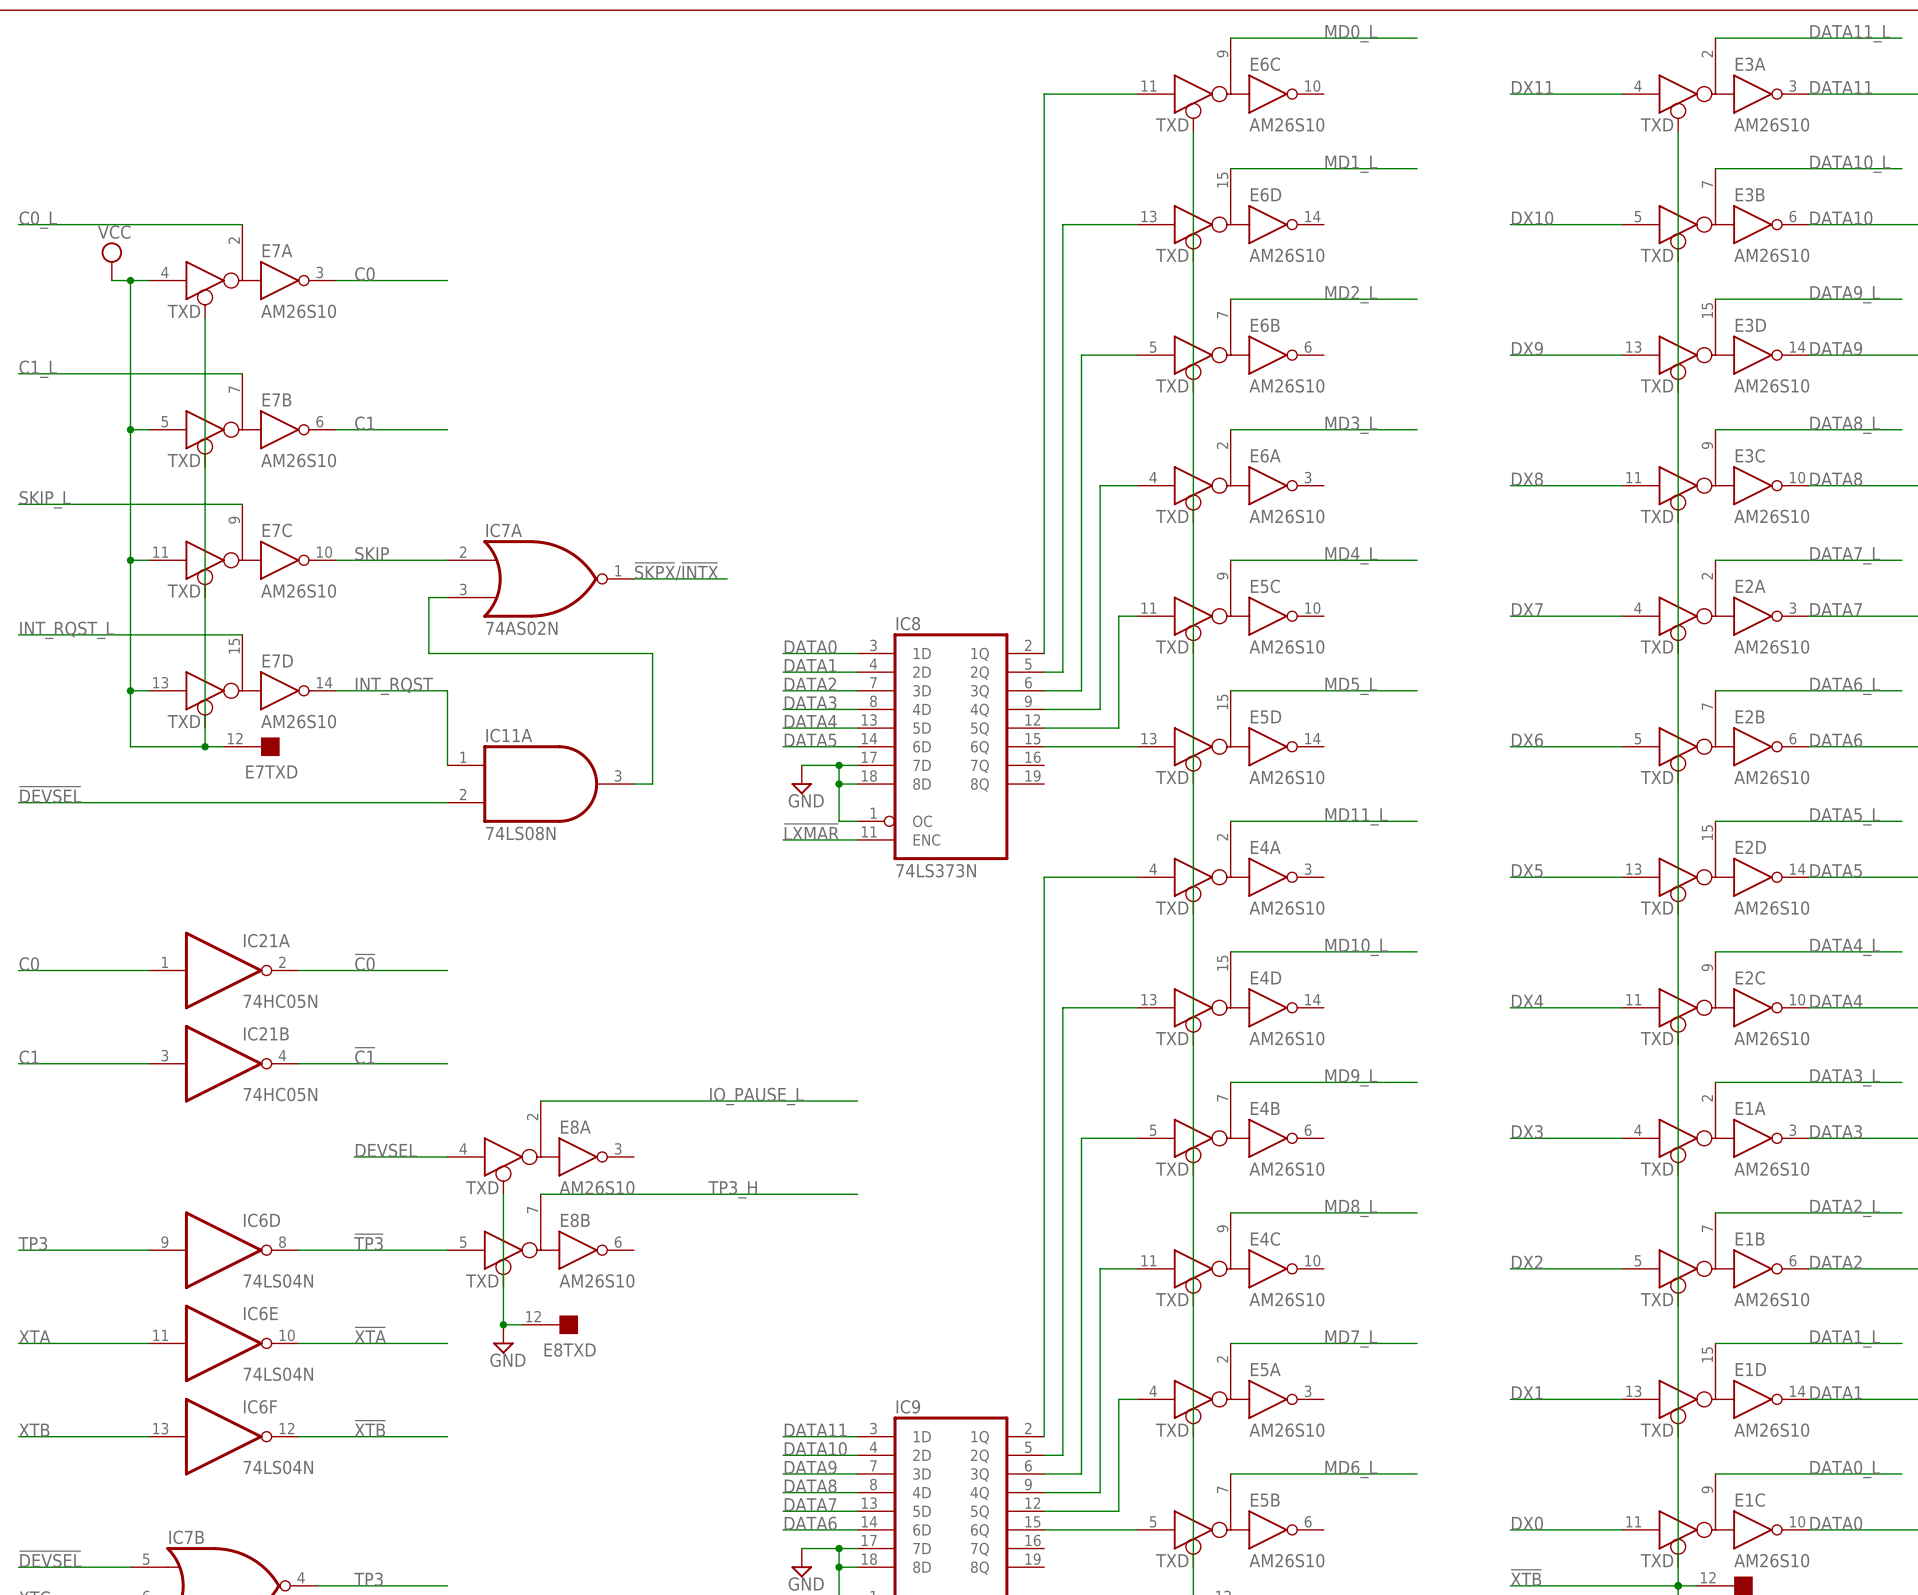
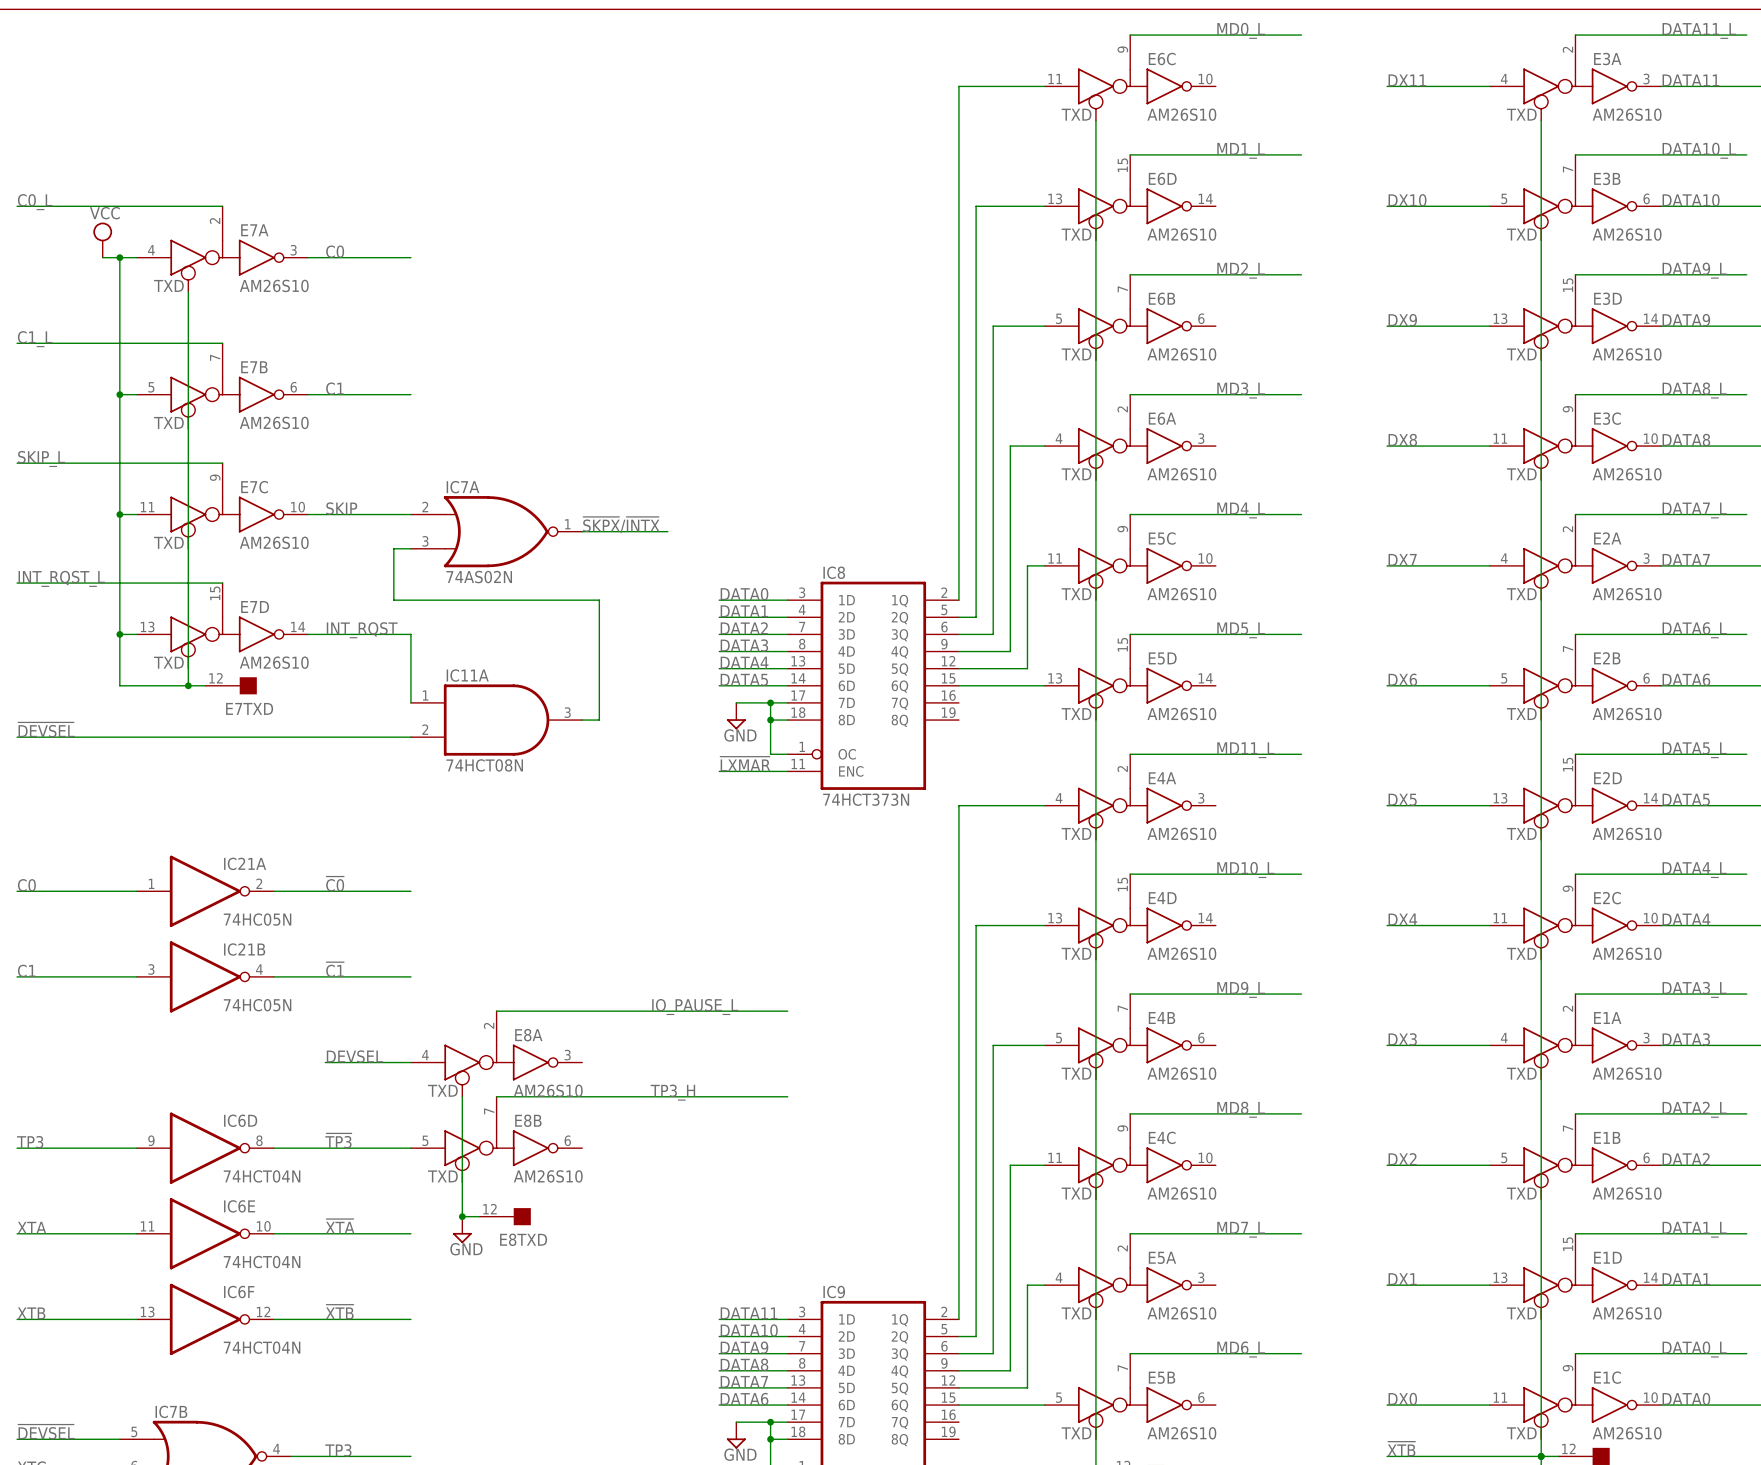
IC11A value: 74LS08N (520, 833) -> 74HCT08N (484, 765)
IC8 value: 74LS373N (936, 870) -> 74HCT373N (866, 799)
IC6D value: 74LS04N (278, 1280) -> 74HCT04N (262, 1176)
IC6E value: 74LS04N (278, 1374) -> 74HCT04N (262, 1262)
IC6F value: 74LS04N (278, 1467) -> 74HCT04N (262, 1347)

